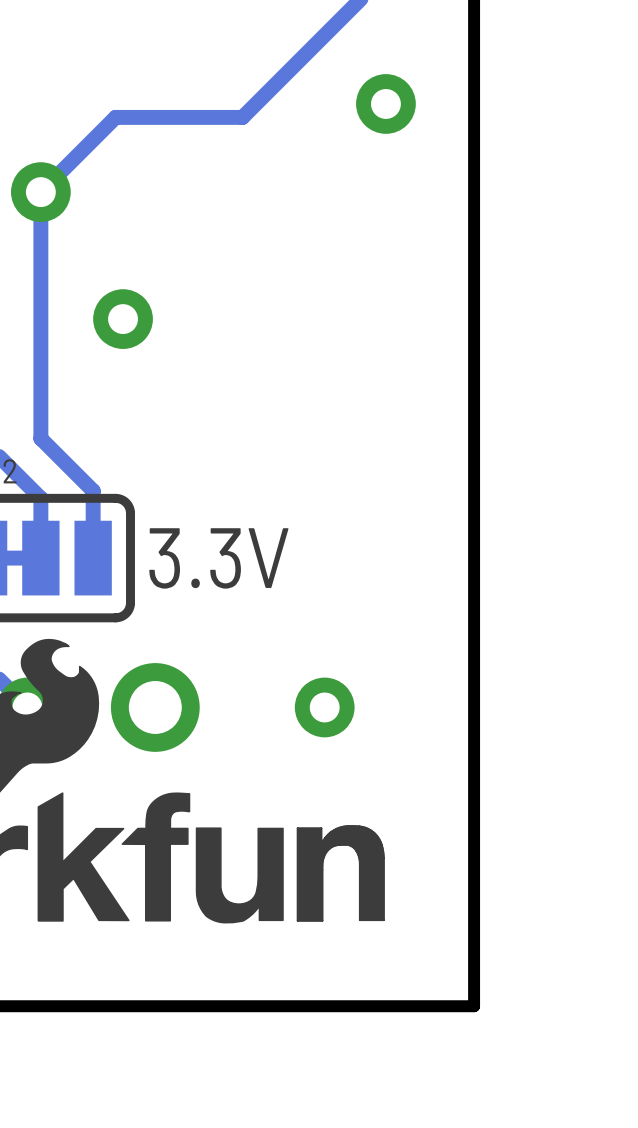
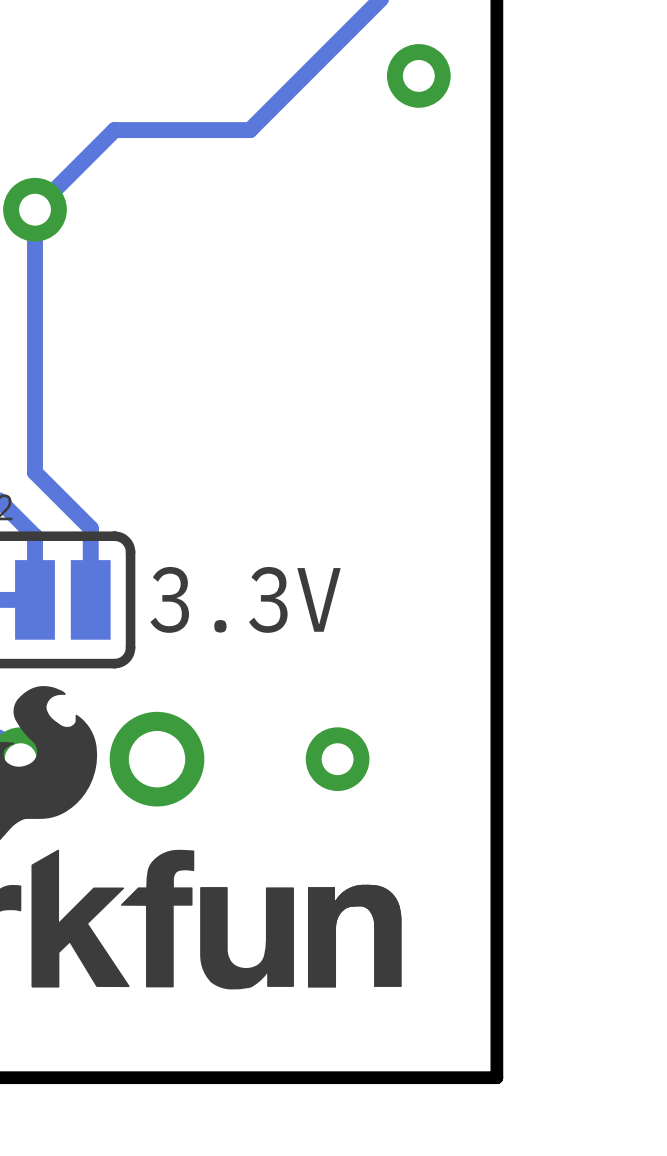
via position: (385, 103) -> (418, 75)
via: (123, 319) -> none

